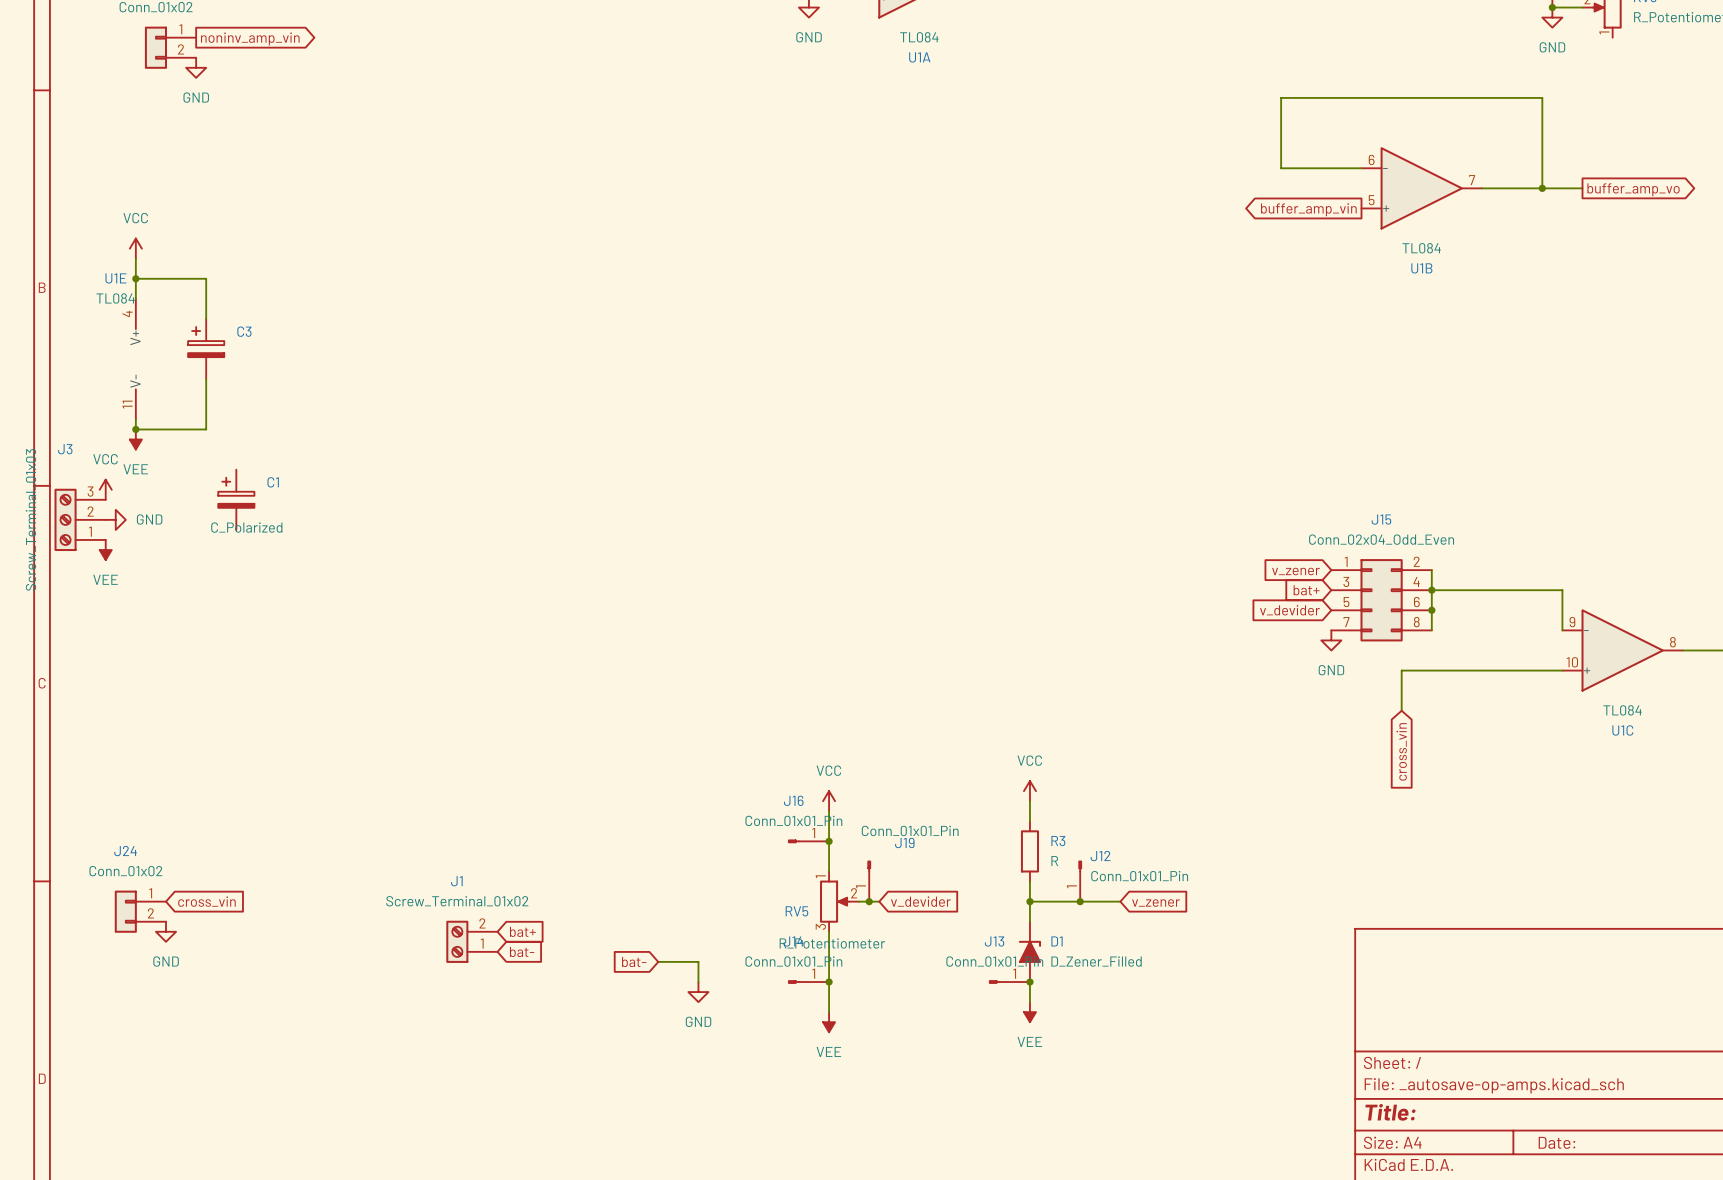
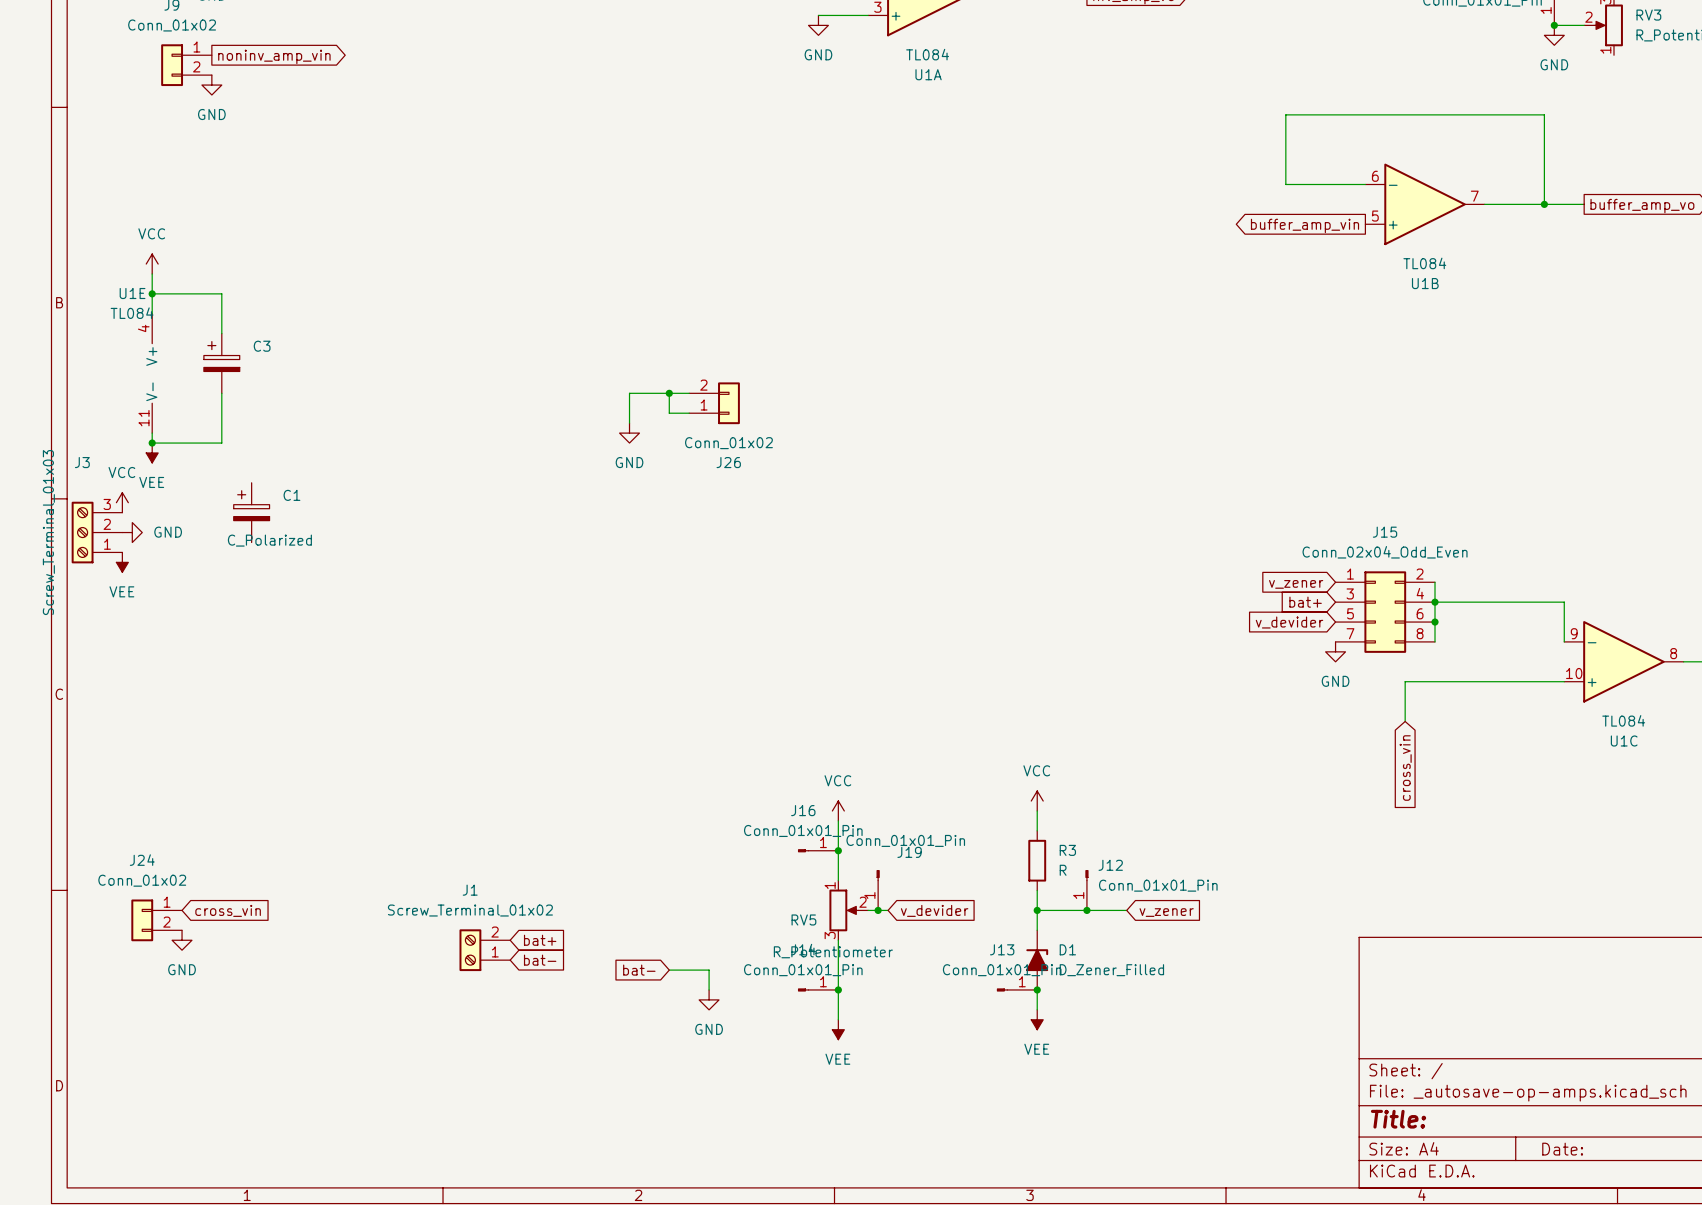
wire: none -> (669, 393) (669, 413) (689, 413)
junction: none -> (669, 393)
wire: none -> (689, 393) (629, 393) (629, 423)
J26: none -> Conn_01x02 (714, 403)
power symbol: none -> GND (629, 433)

